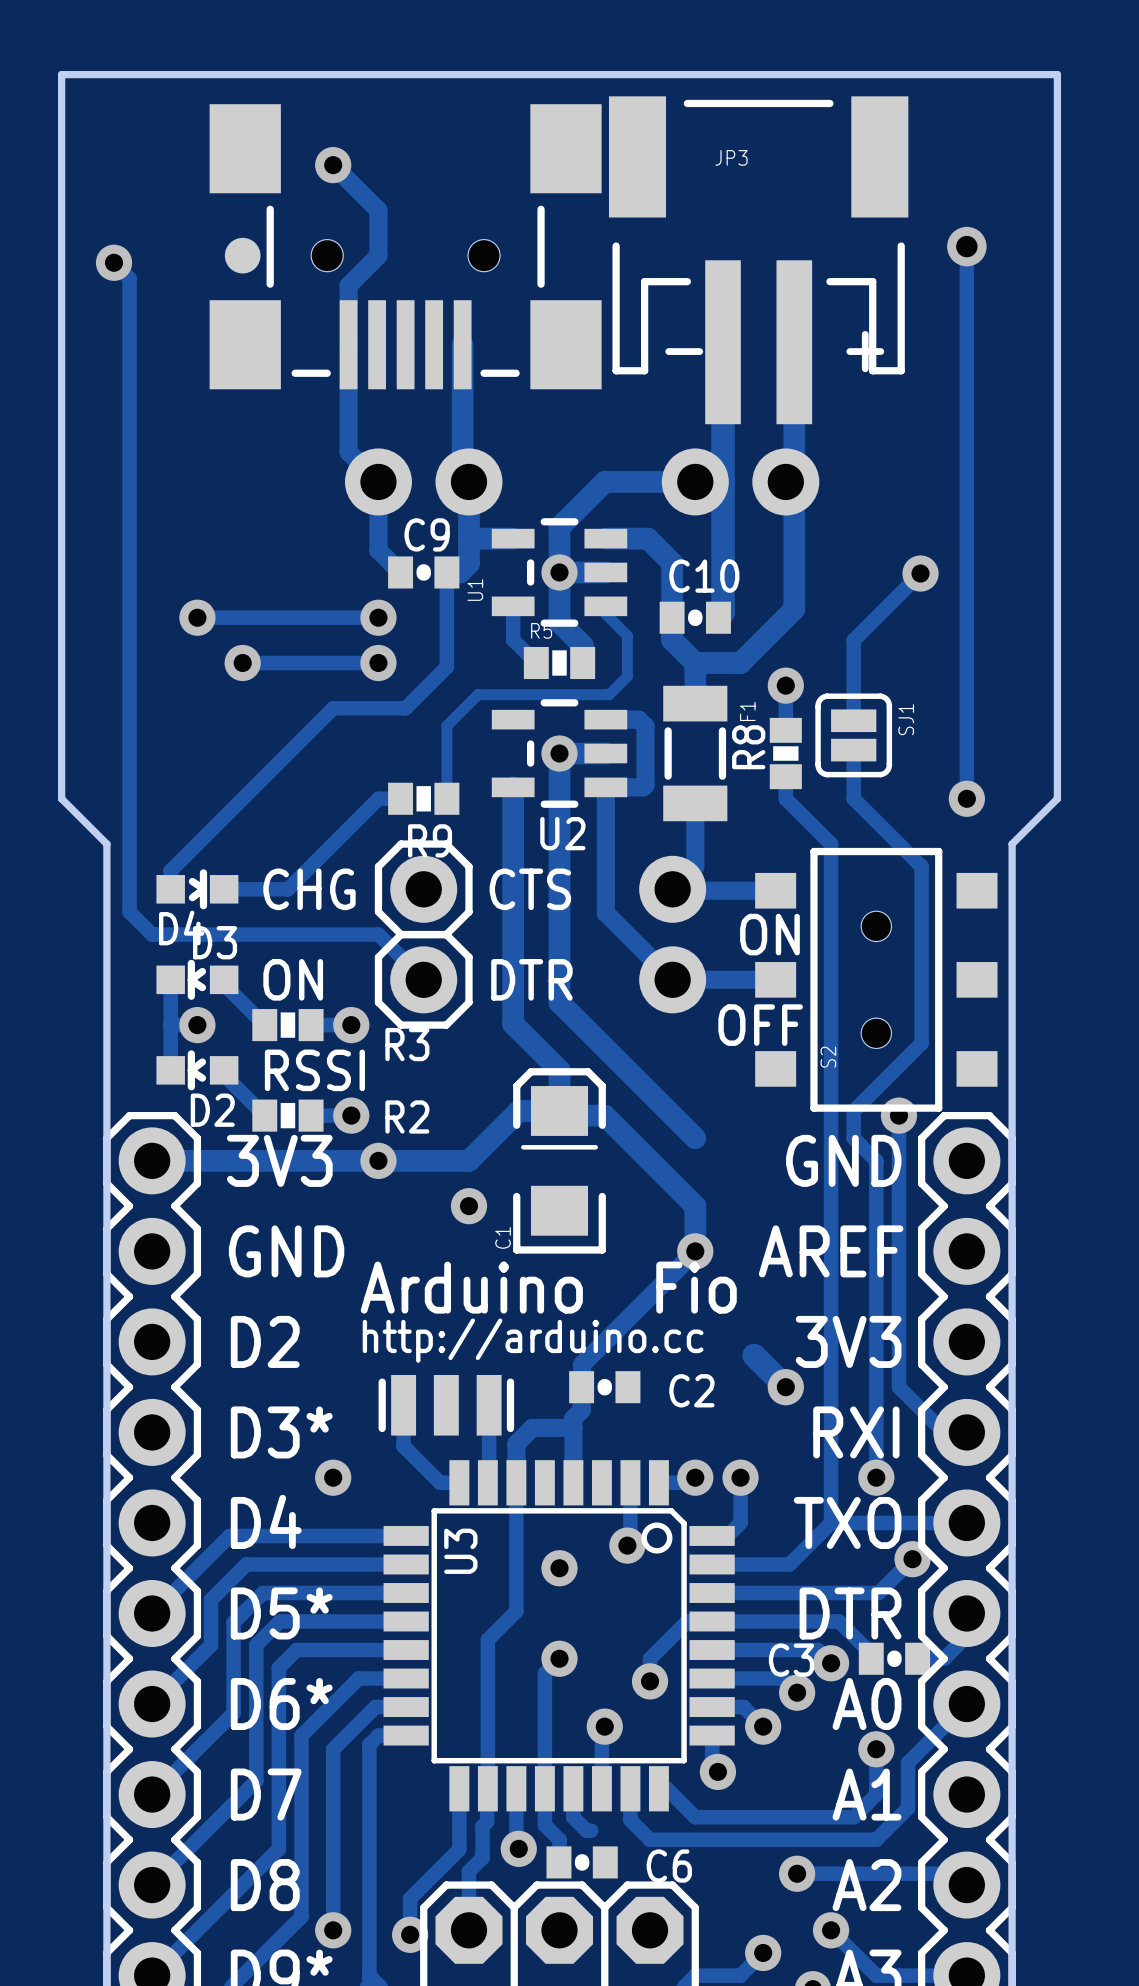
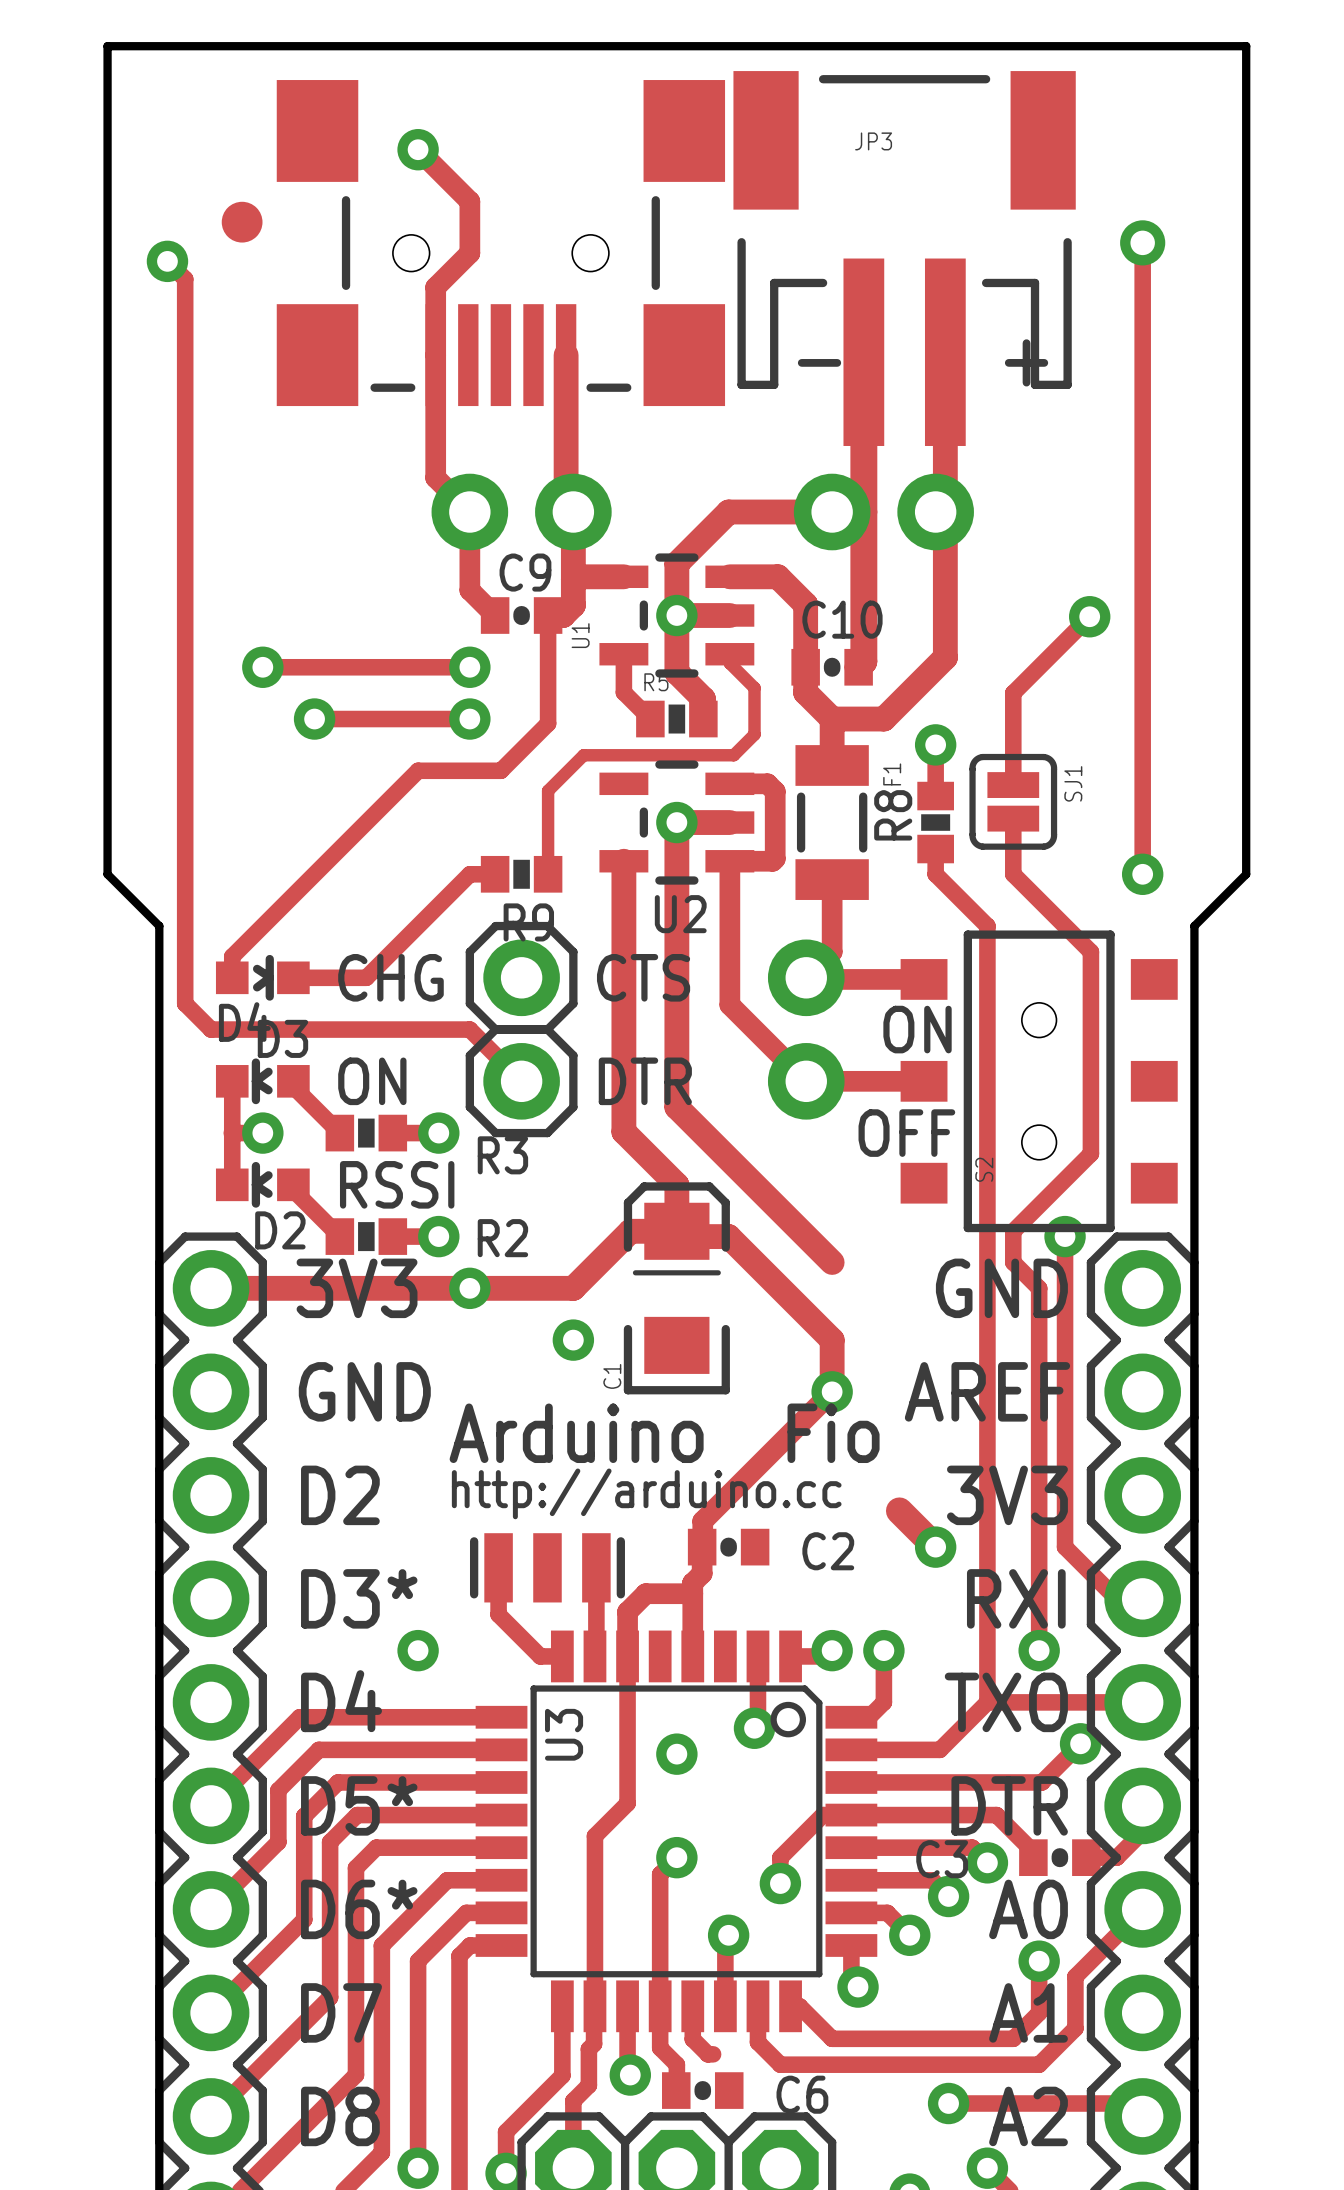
part position: (242, 255) -> (242, 222)

